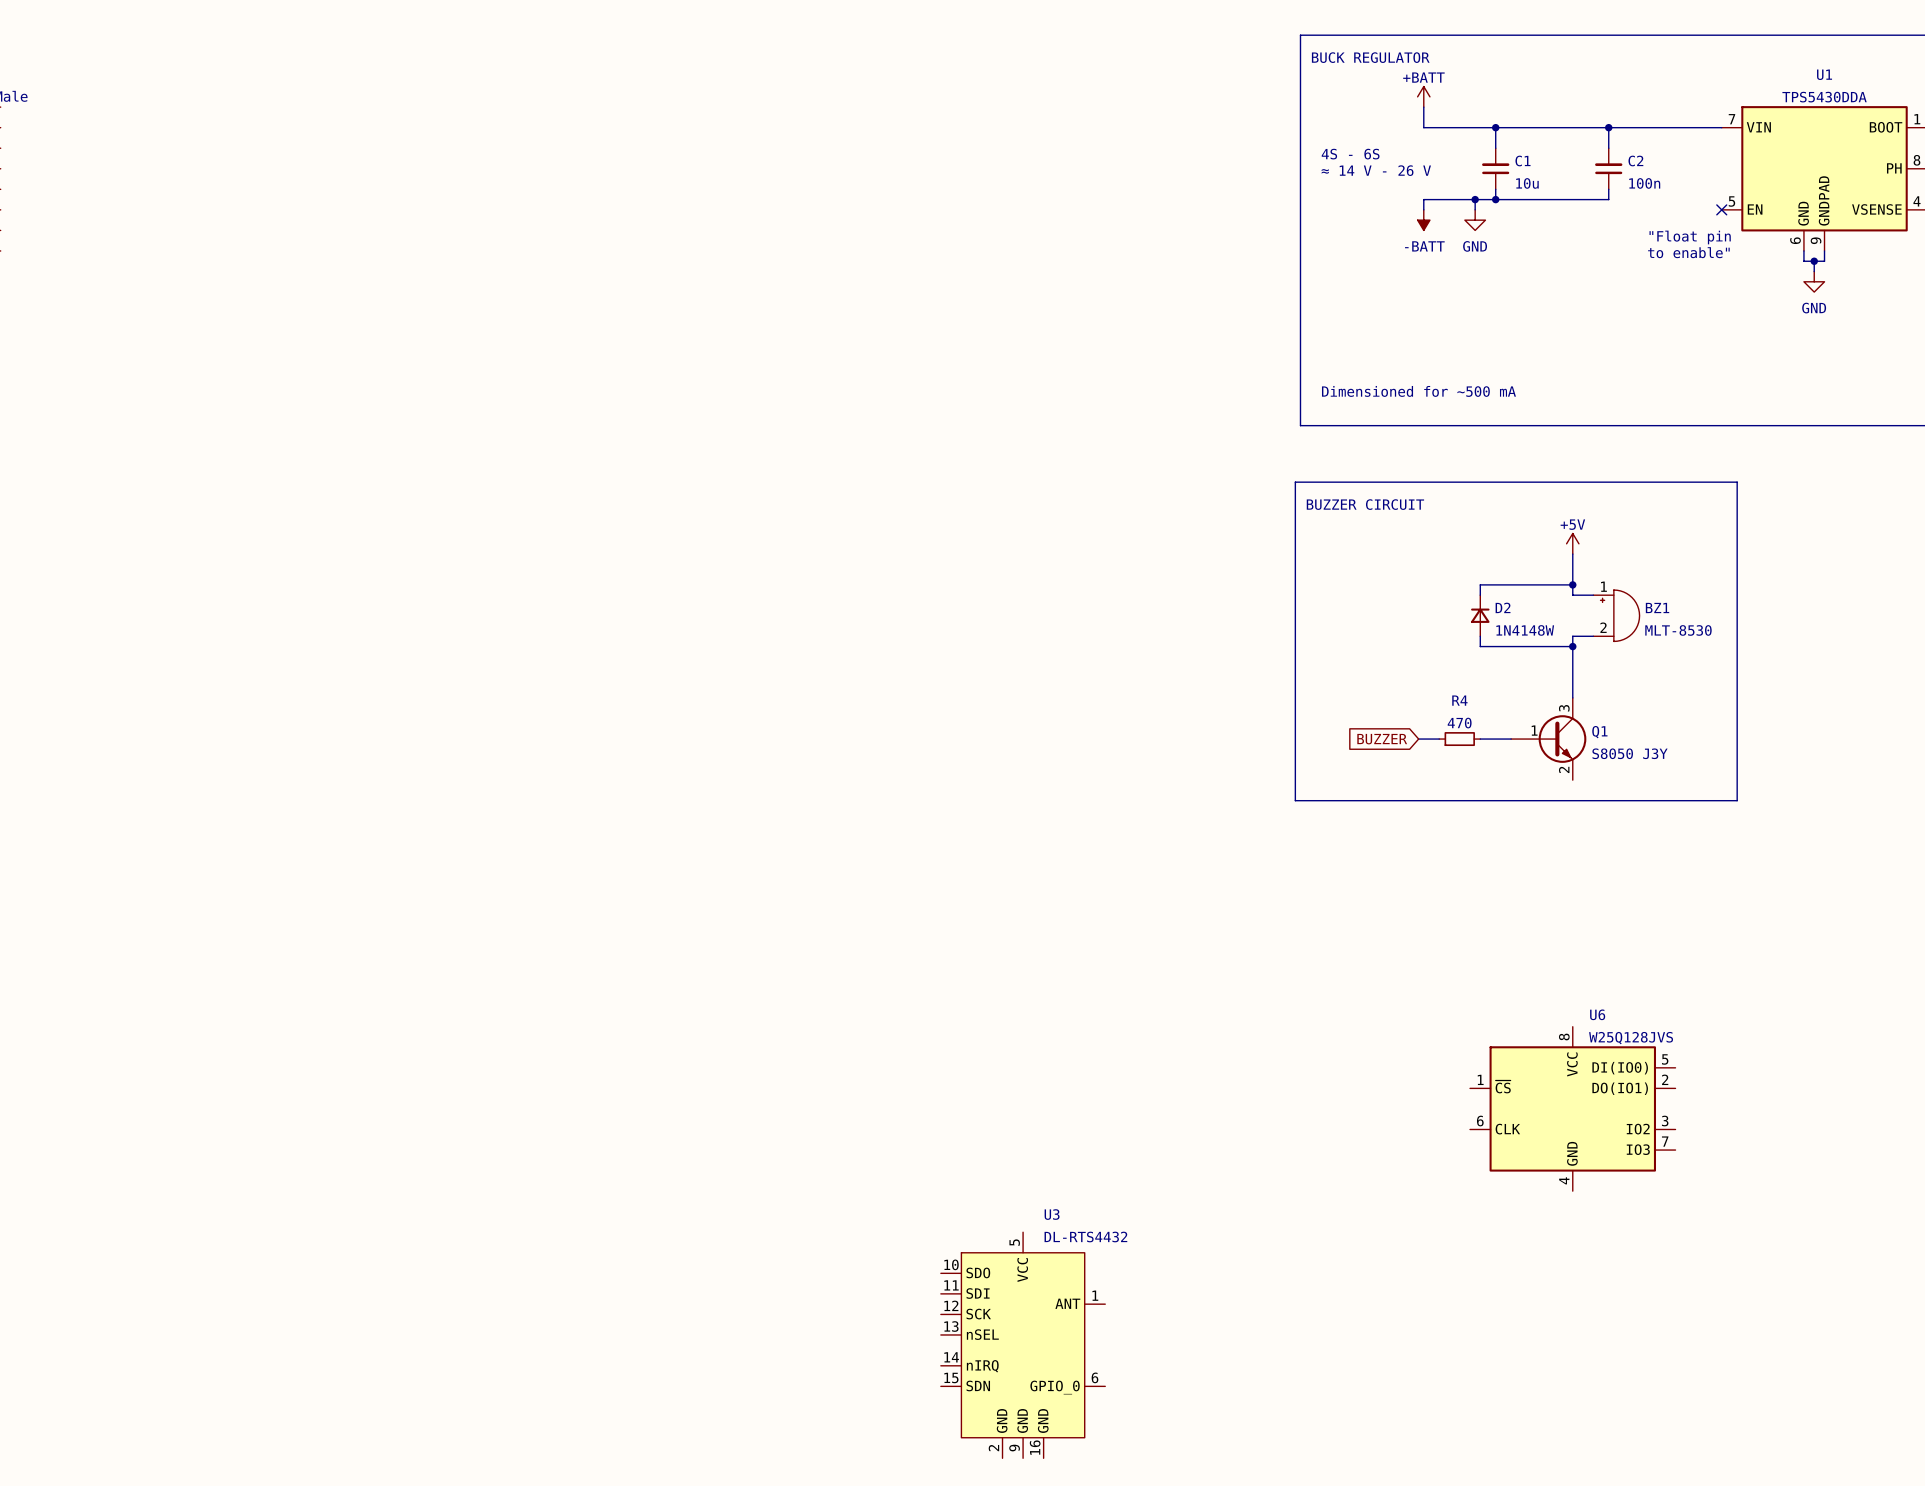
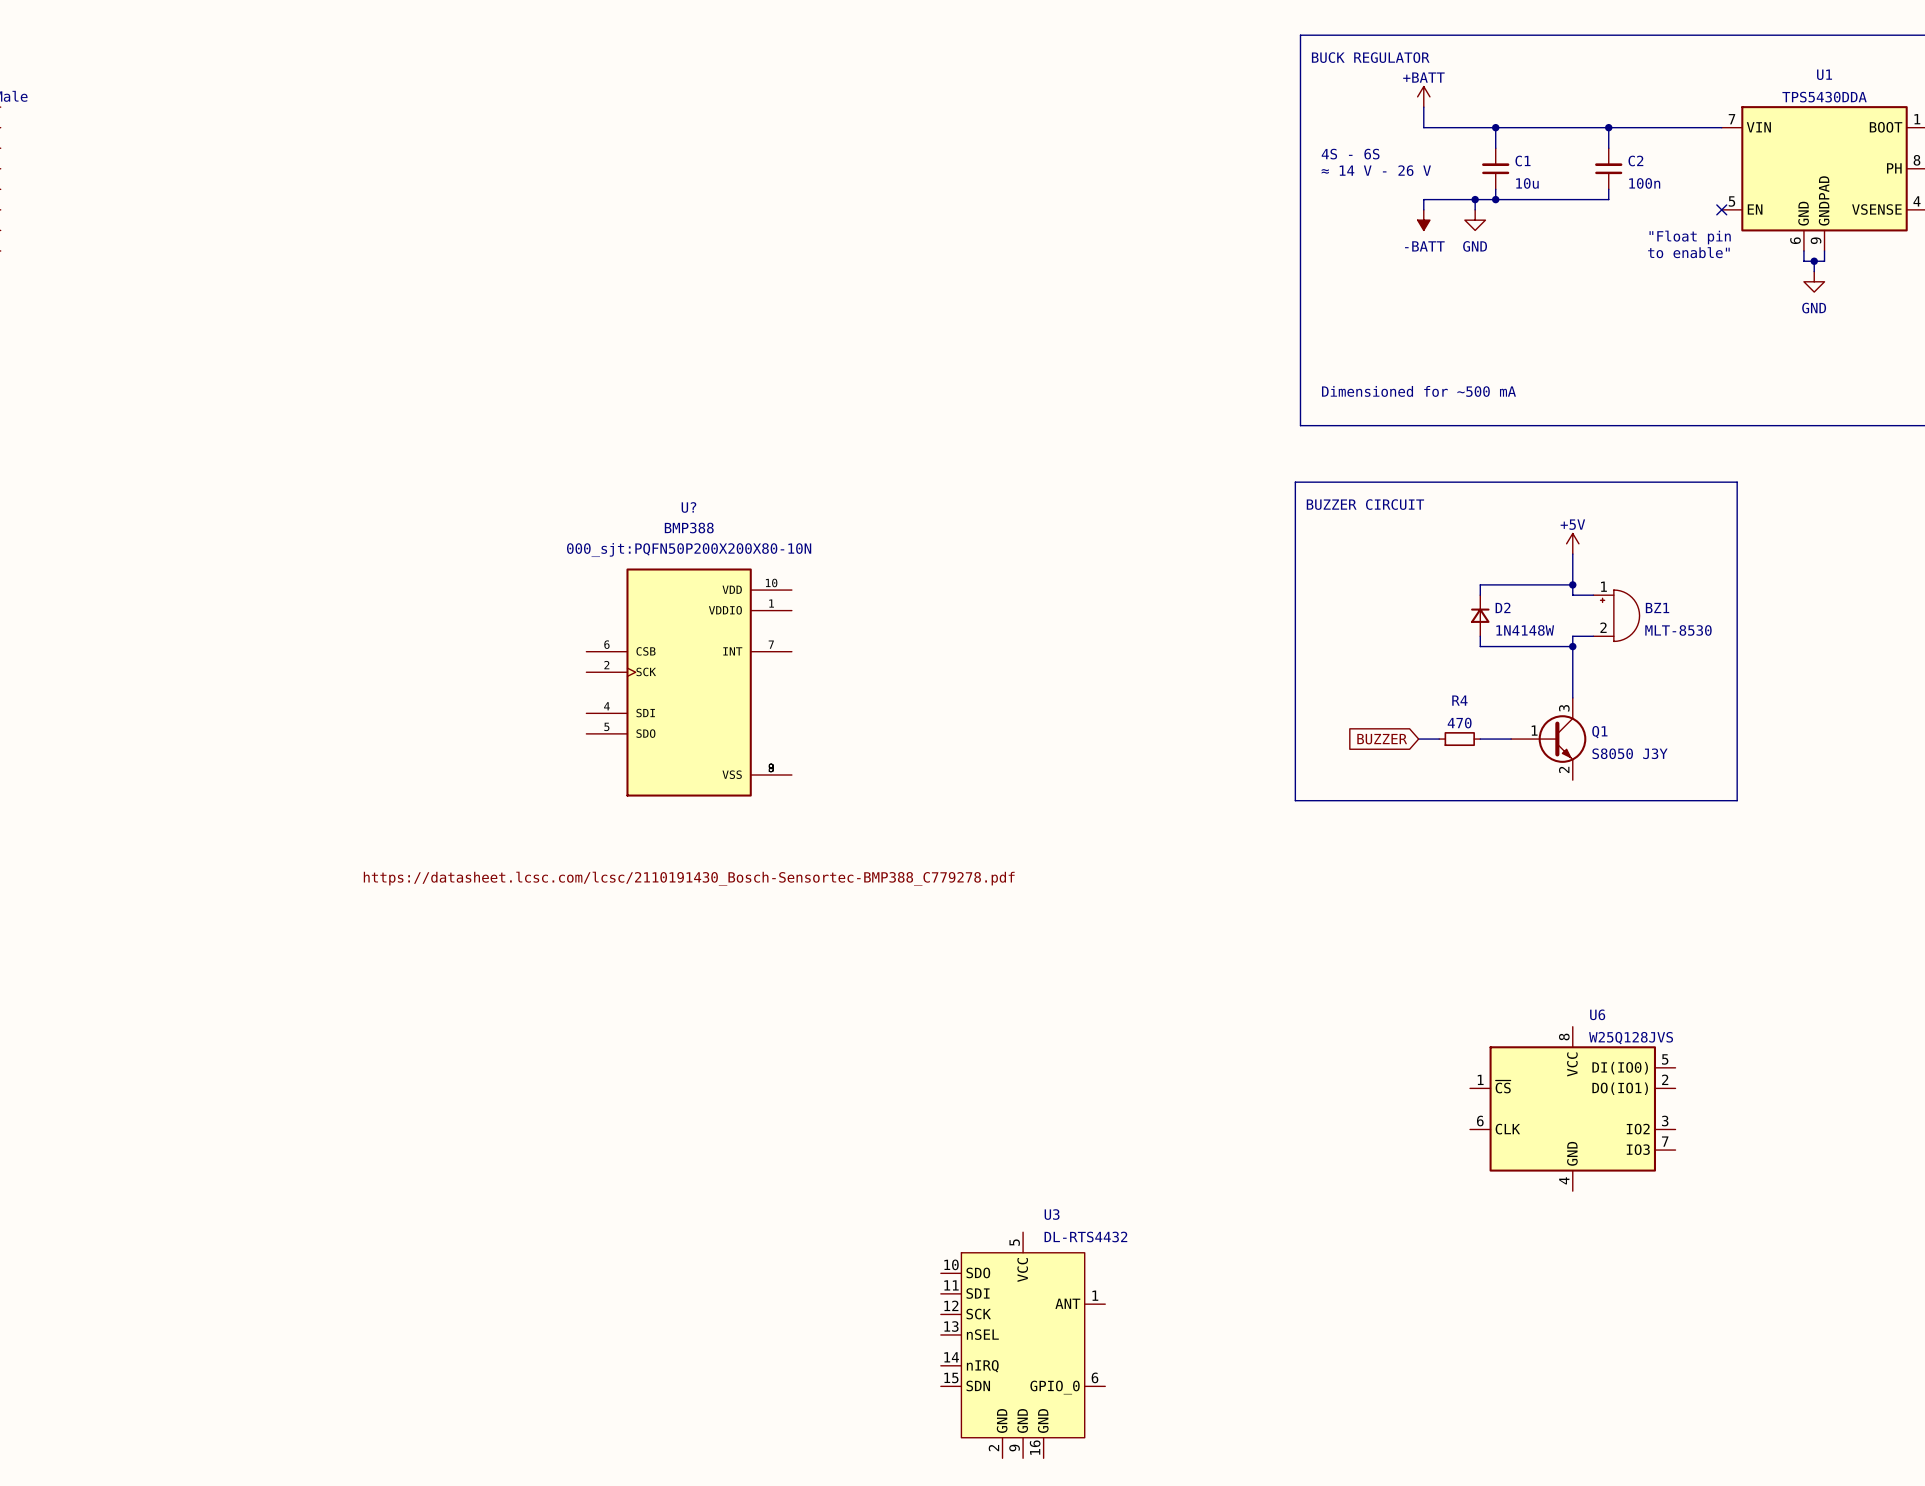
U?: none -> BMP388 (689, 682)

